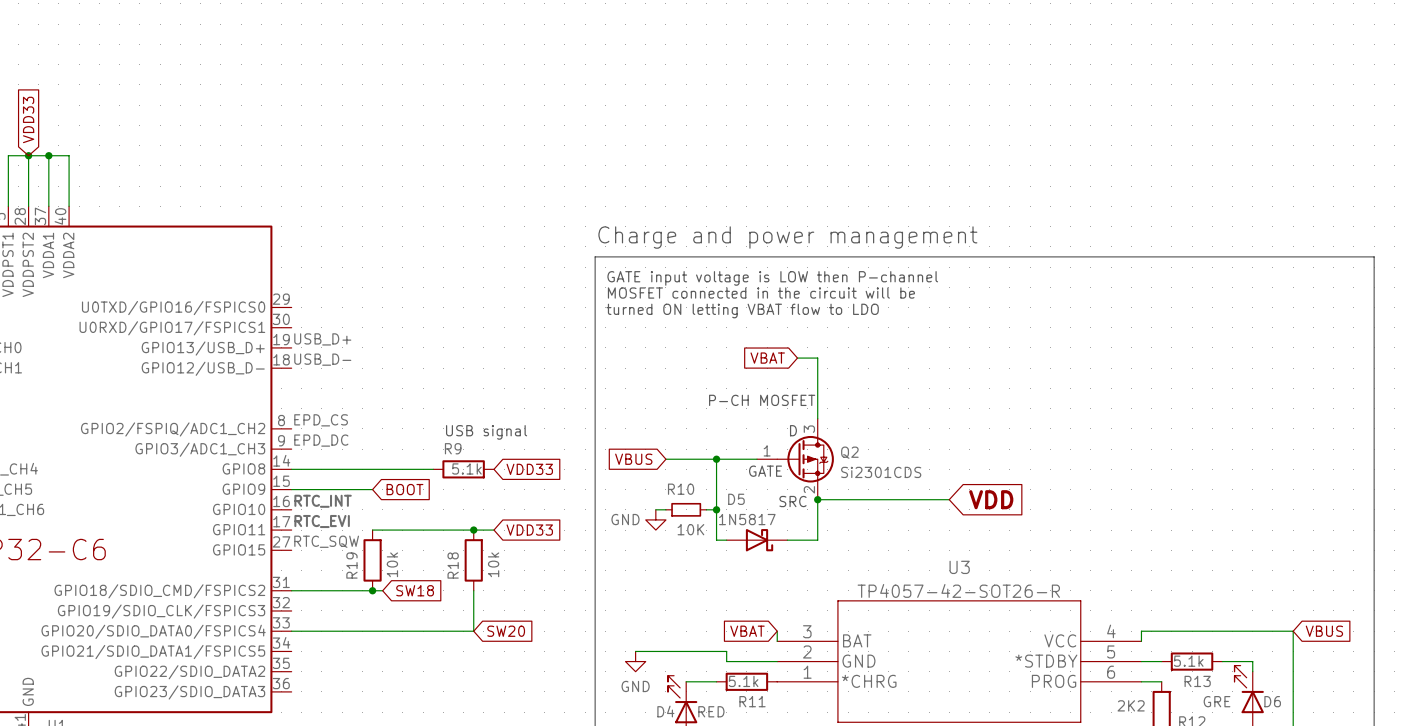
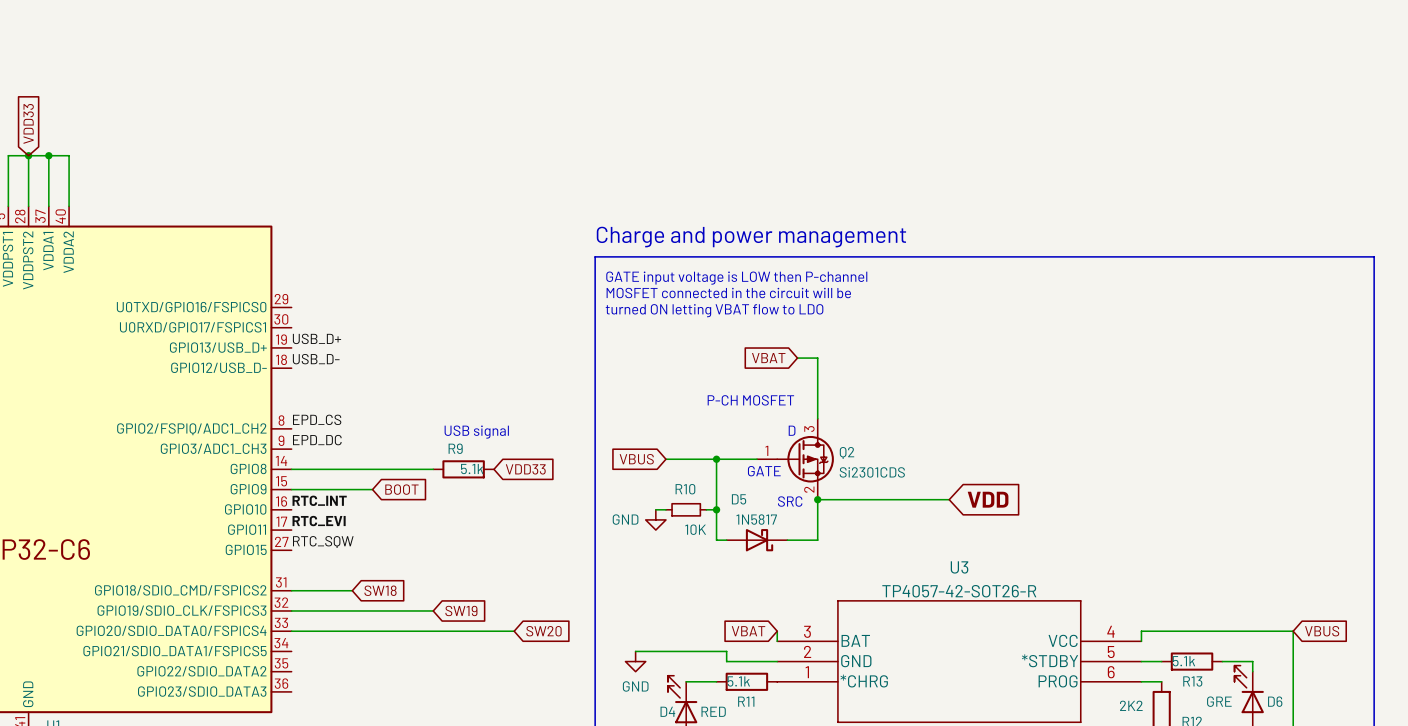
wire: (372, 530) (493, 530) -> none
junction: (473, 530) -> none
global label: VDD33 (529, 530) -> none
R19: 10k (372, 560) -> none
R18: 10k (473, 560) -> none
wire: (352, 590) (382, 590) -> none
junction: (372, 590) -> none
global label position: SW18 (415, 590) -> SW18 (380, 590)
wire: (473, 590) (473, 631) -> (514, 631) (473, 631)
wire: none -> (291, 610) (433, 610)
global label: none -> SW19 (461, 610)
global label position: SW20 (506, 631) -> SW20 (543, 631)

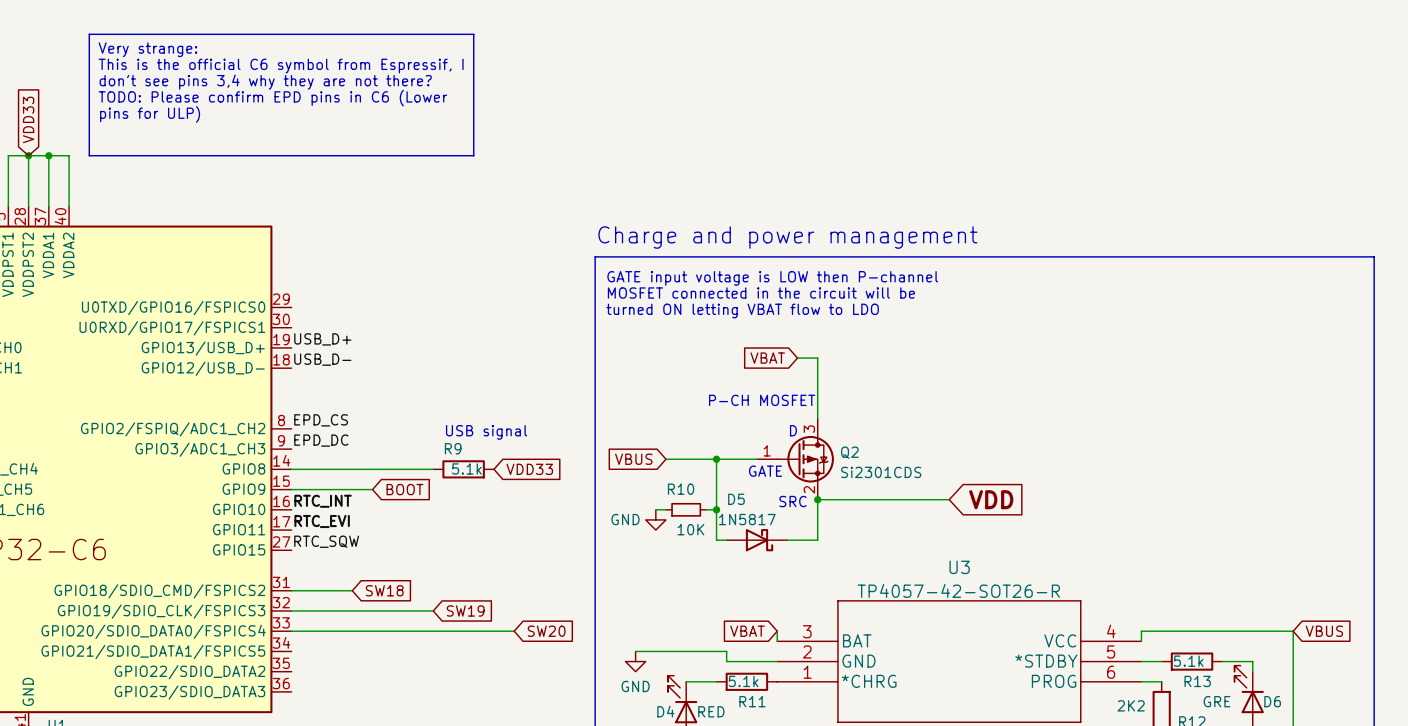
line: none -> (89, 34) (473, 34) (473, 155) (89, 155) (89, 34)
text: none -> Very strange: (147, 49)
text: none -> This is the official C6 symbol from Espressif, I (281, 66)
text: none -> don't see pins 3,4 why they are not there? (265, 82)
text: none -> TODO: Please confirm EPD pins in C6 (Lower (272, 98)
text: none -> pins for ULP) (150, 114)

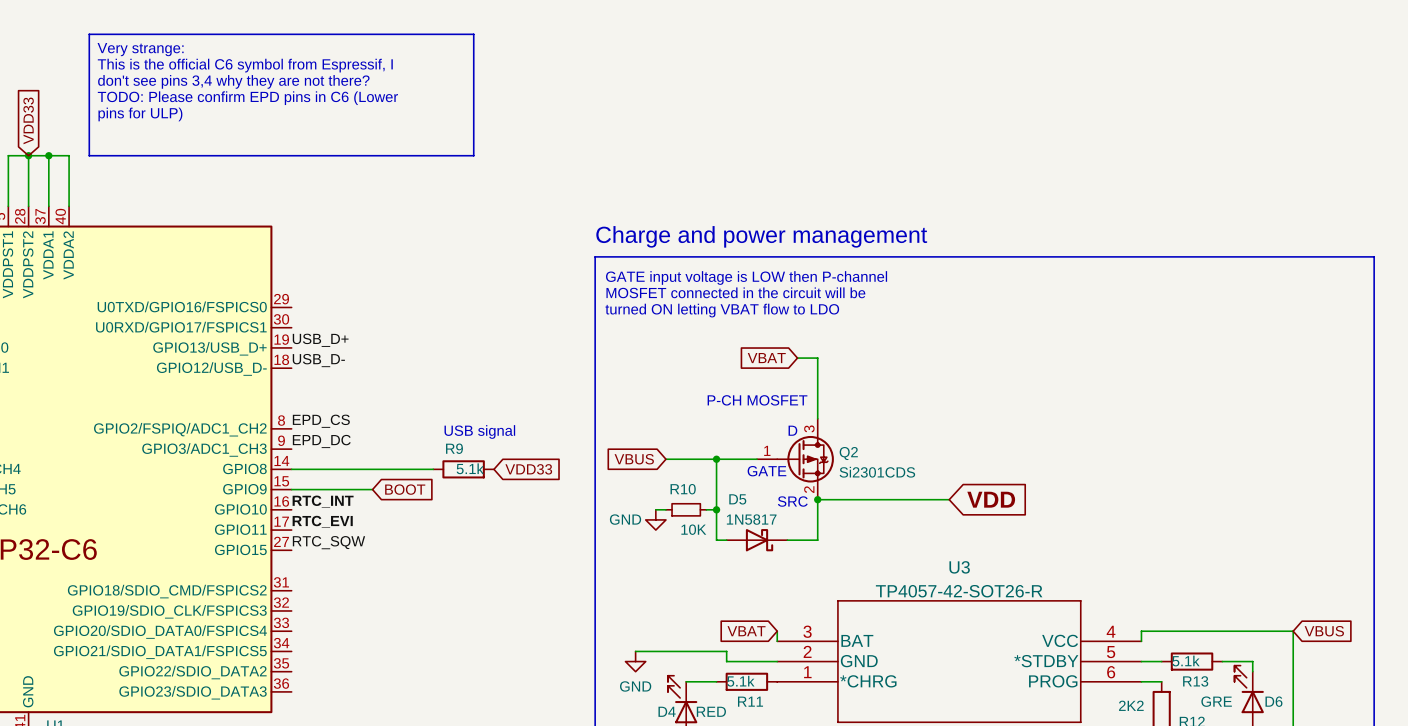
wire: (291, 590) (352, 590) -> none
global label: SW18 (384, 590) -> none
wire: (291, 610) (433, 610) -> none
global label: SW19 (465, 610) -> none
wire: (291, 631) (514, 631) -> none
global label: SW20 (546, 631) -> none

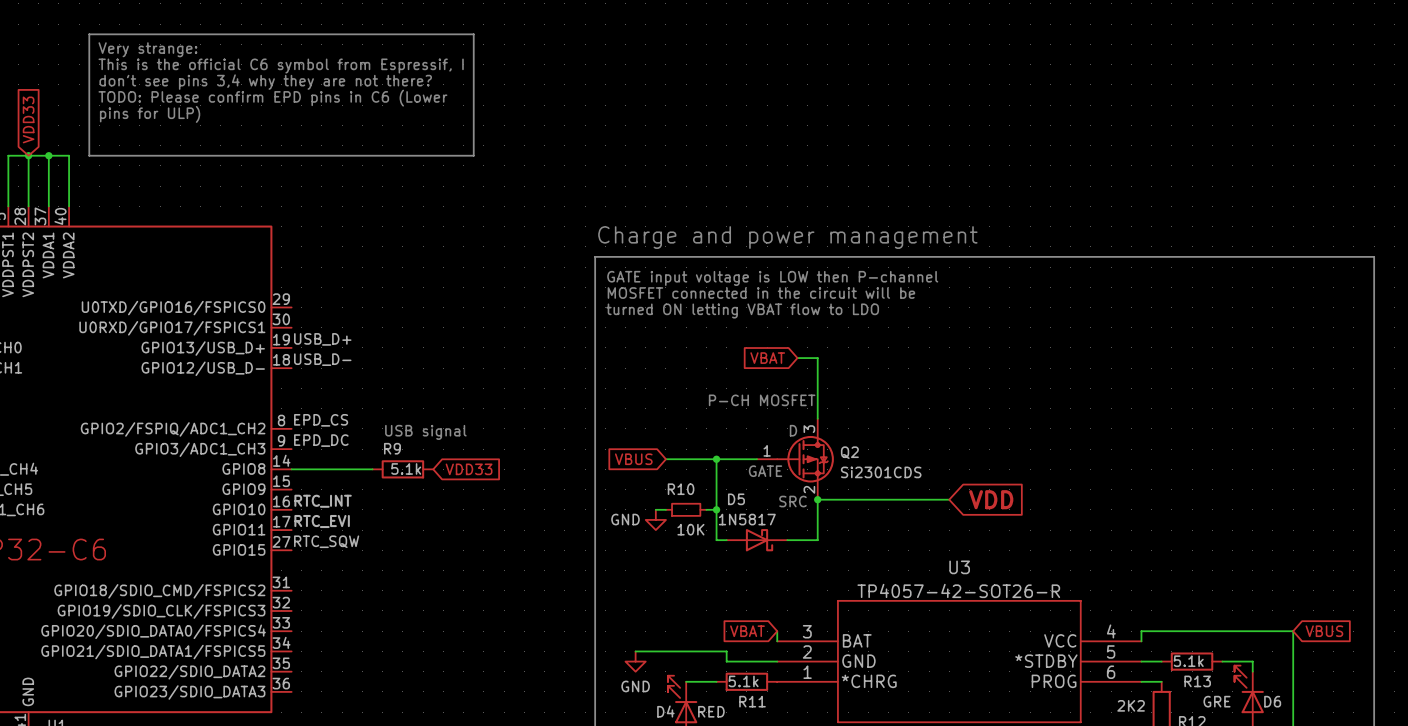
text position: USB signal (479, 431) -> USB signal (425, 432)
wire: (372, 469) (433, 469) -> none
R9 position: (463, 469) -> (402, 469)
global label position: VDD33 (528, 469) -> VDD33 (469, 469)
wire: (291, 489) (372, 489) -> none
global label: BOOT (405, 489) -> none

